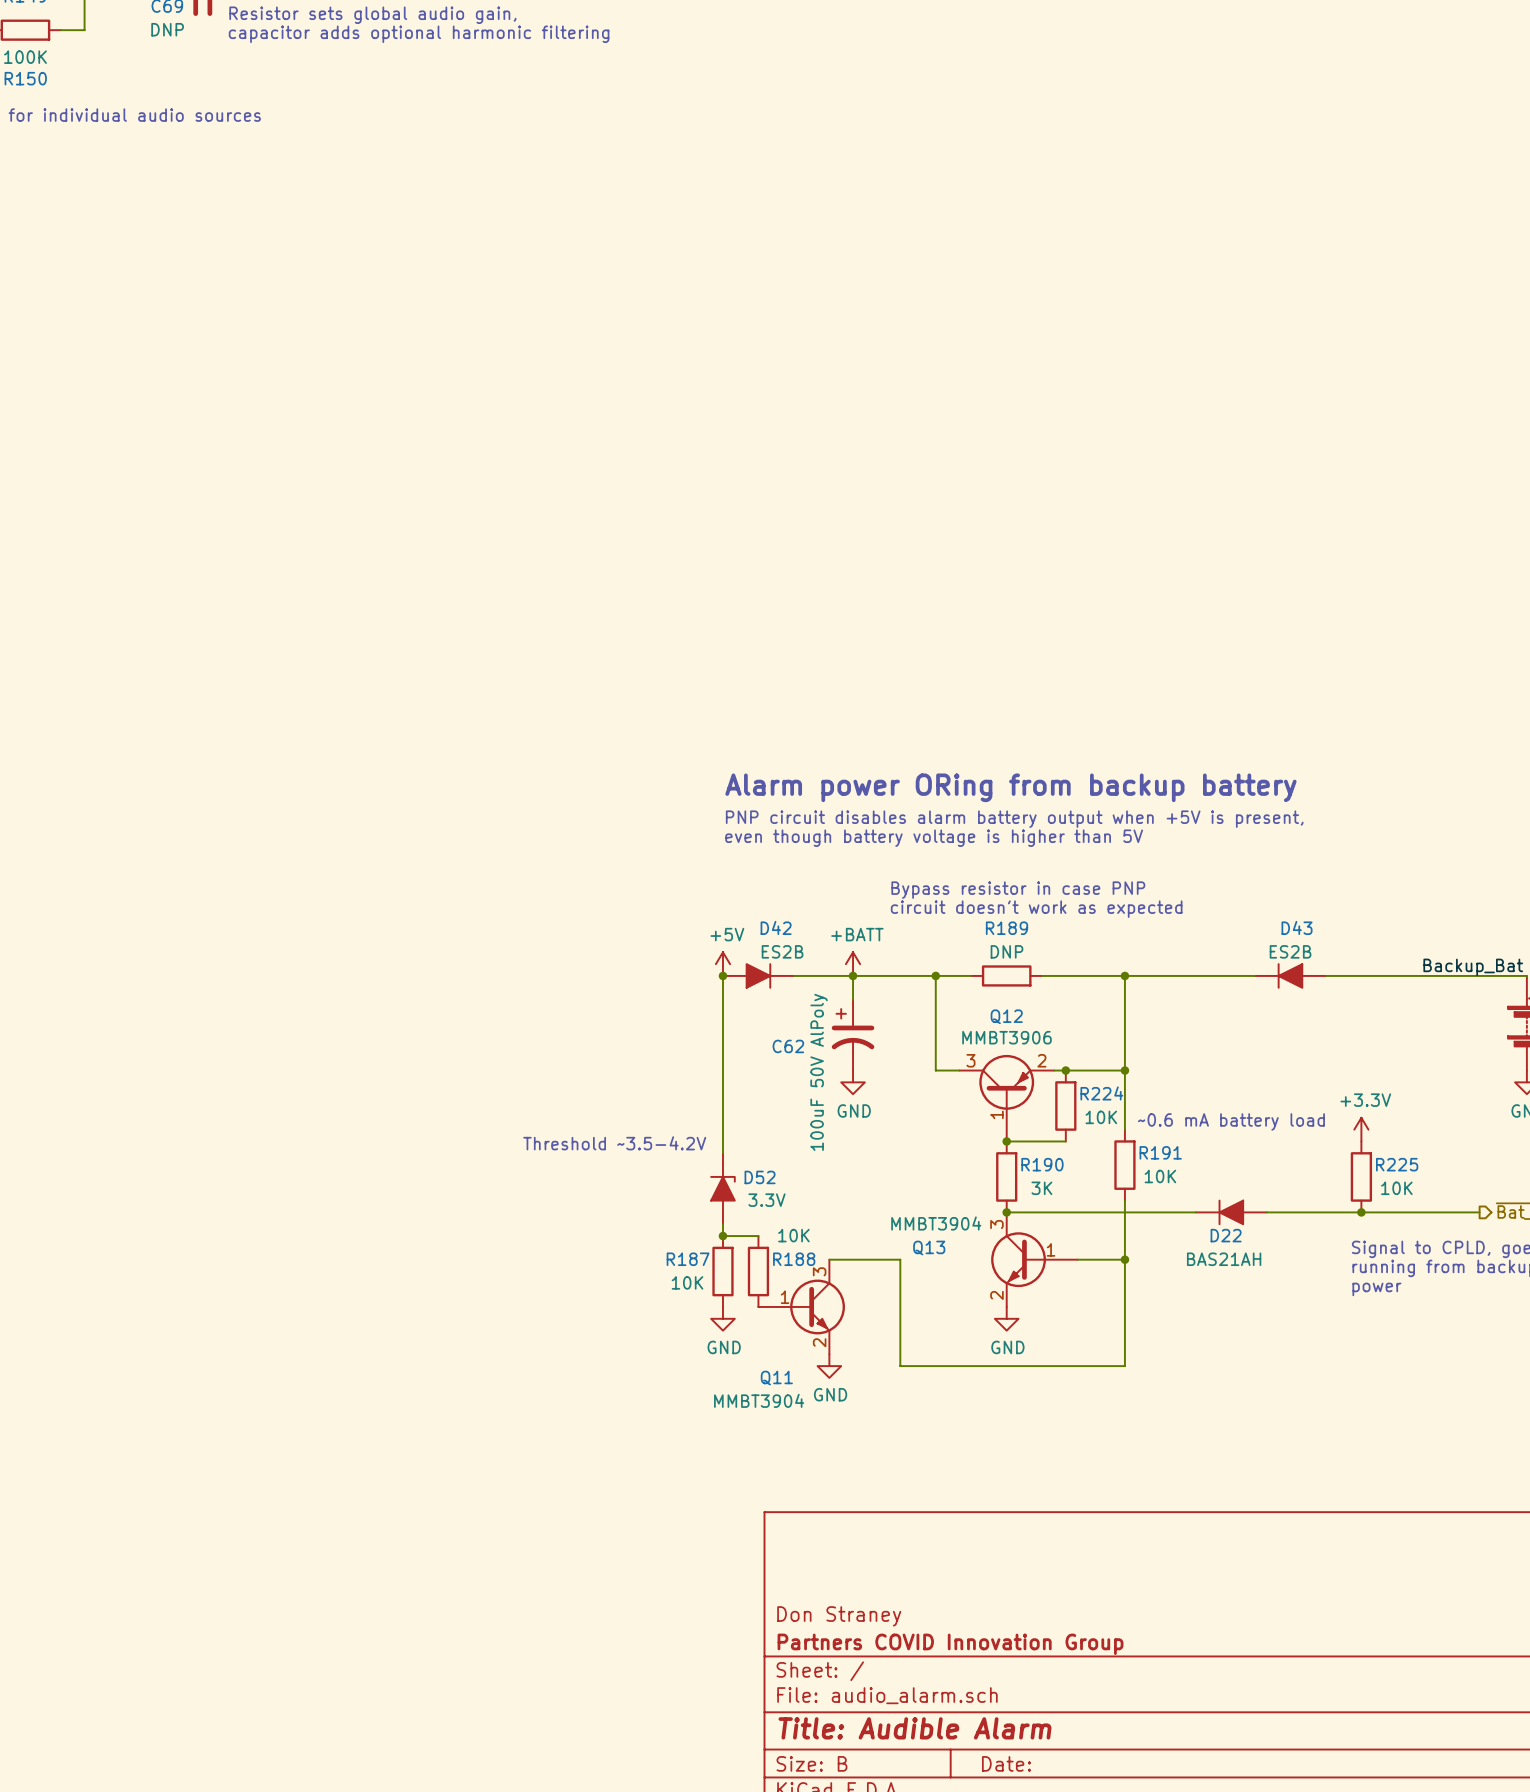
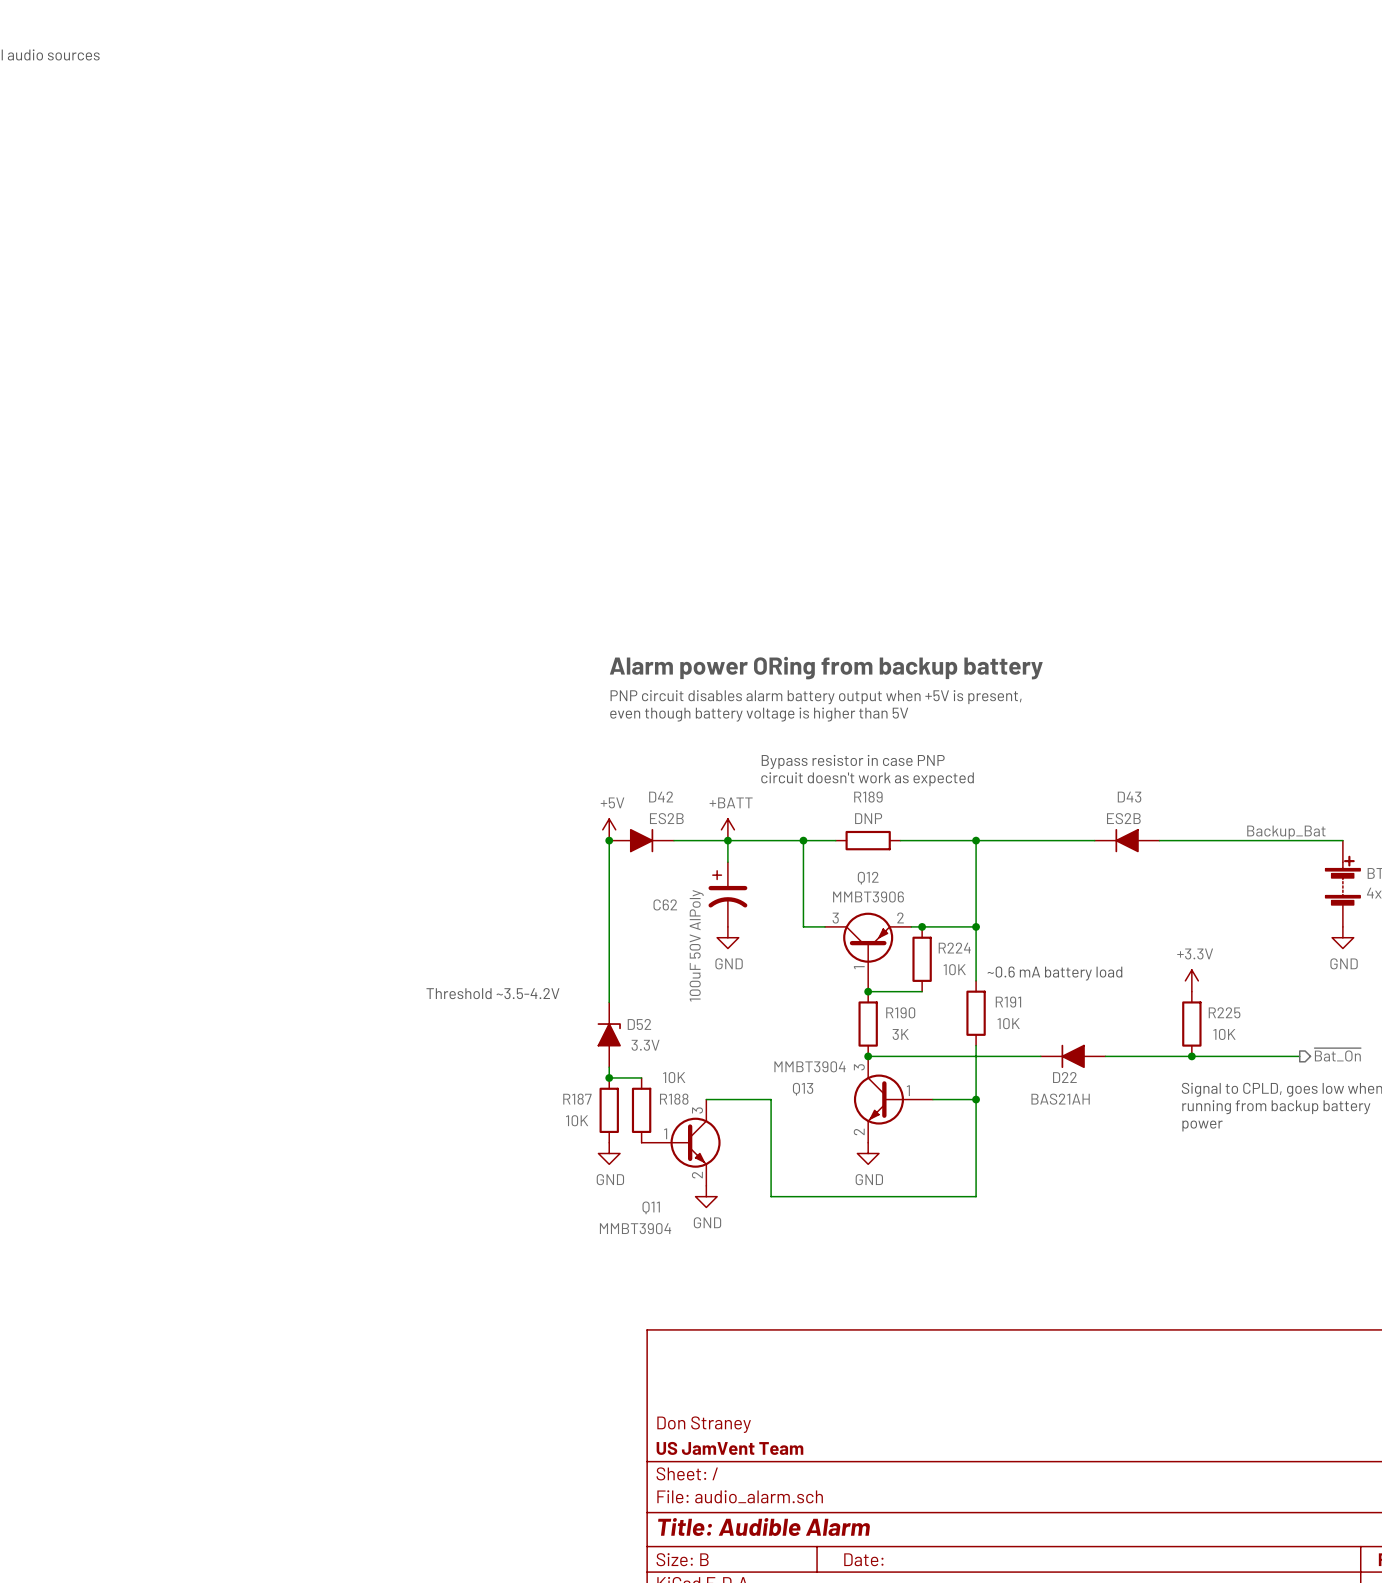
title block: Partners COVID Innovation Group (950, 1644) -> US JamVent Team (729, 1448)

